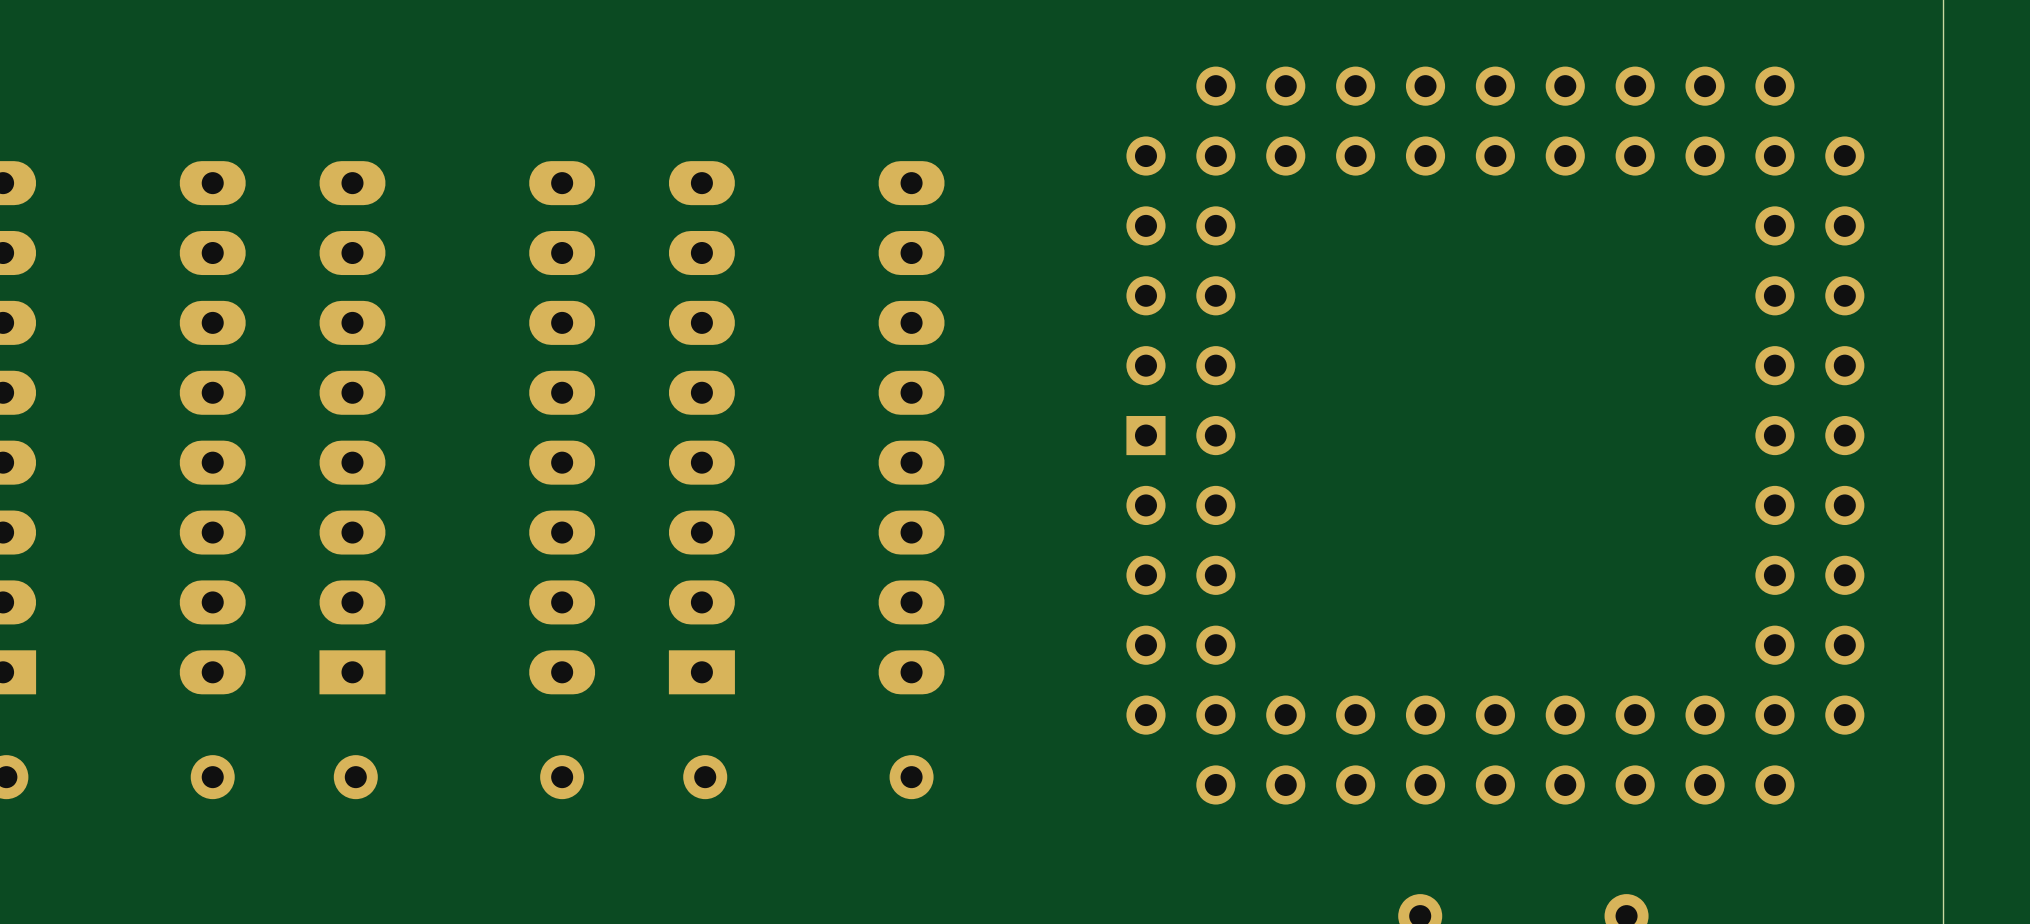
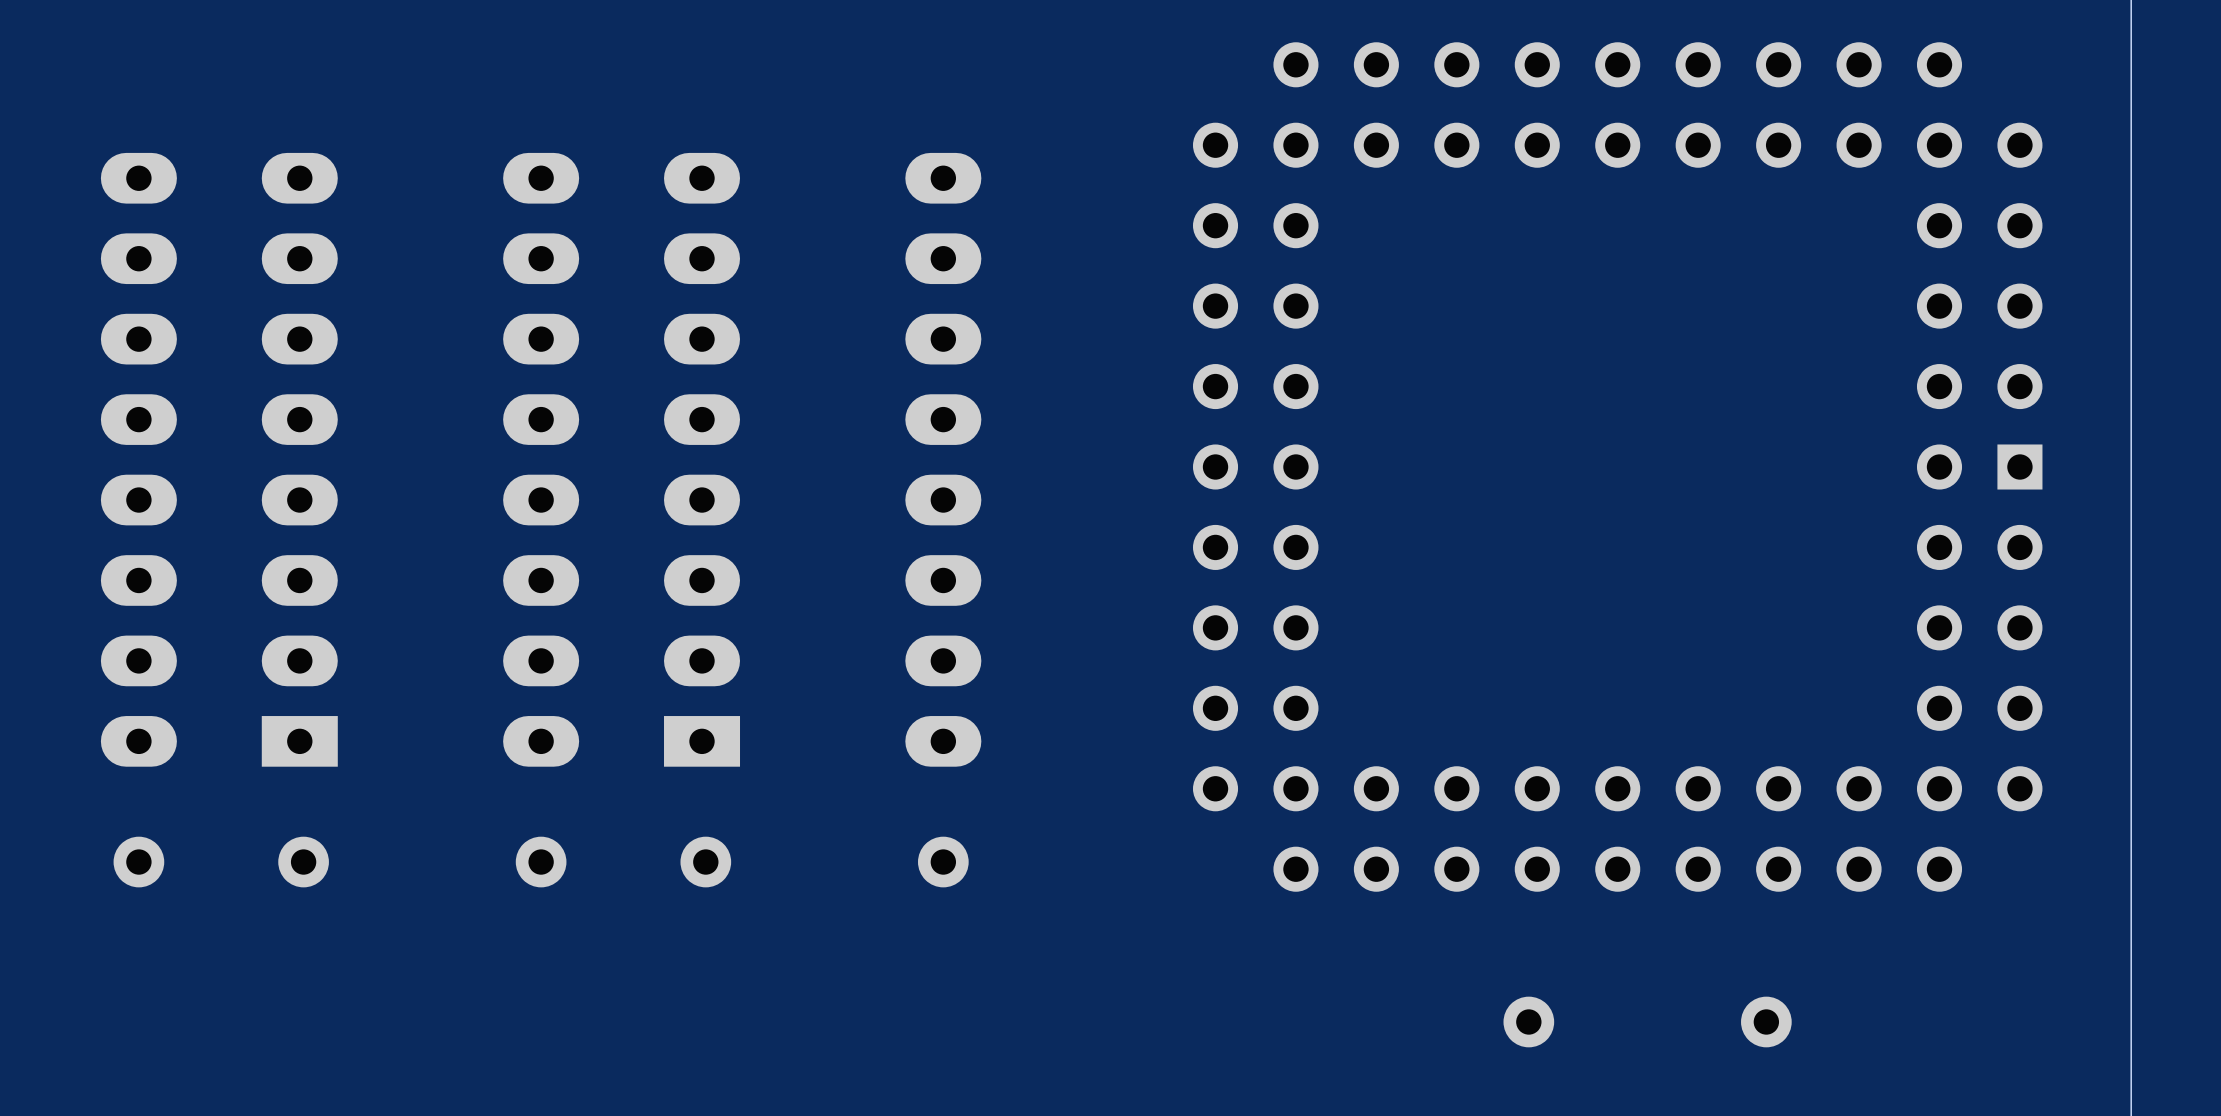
part rotation: 0° (1495, 435) -> 180° (1617, 467)

